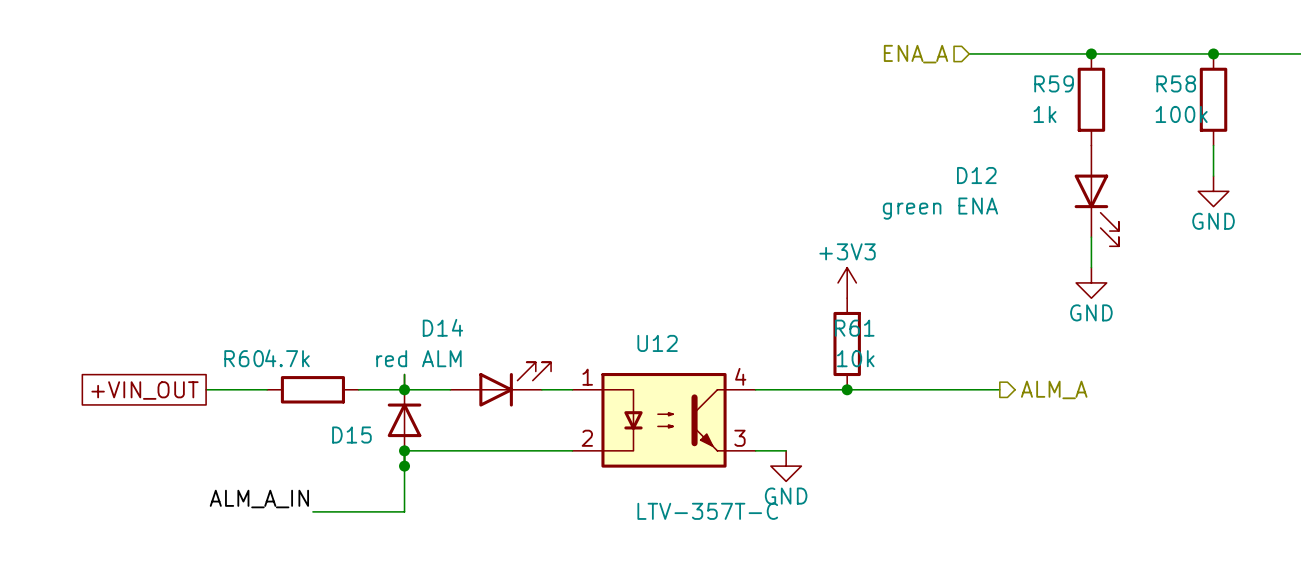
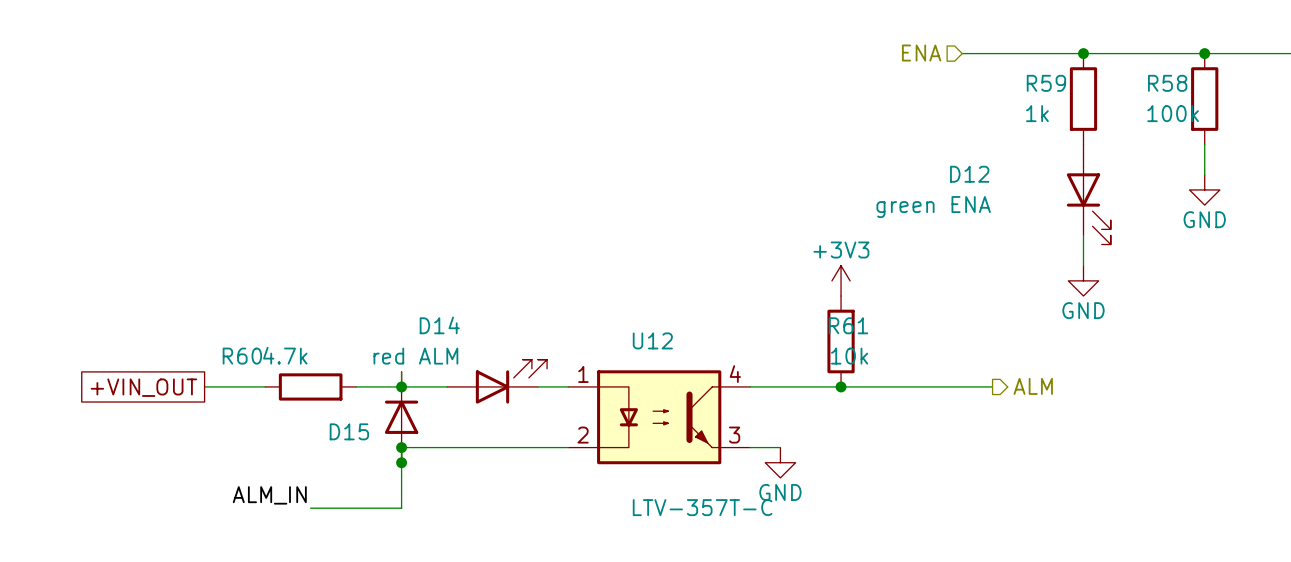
hierarchical label: ENA_A (916, 54) -> ENA (921, 53)
hierarchical label: ALM_A (1054, 389) -> ALM (1033, 386)
label: ALM_A_IN (259, 499) -> ALM_IN (269, 495)

